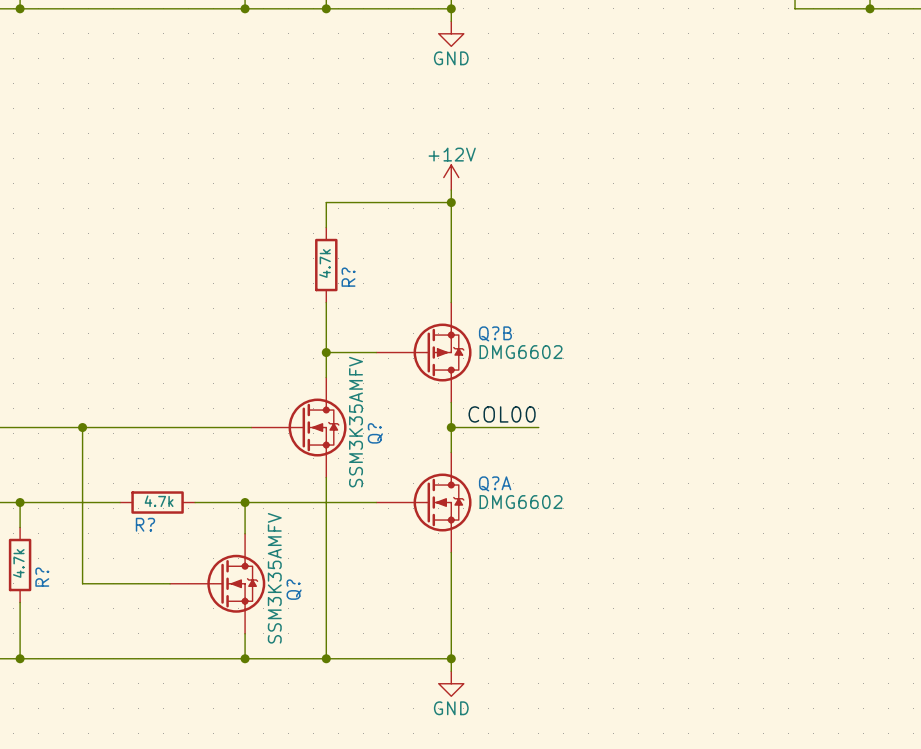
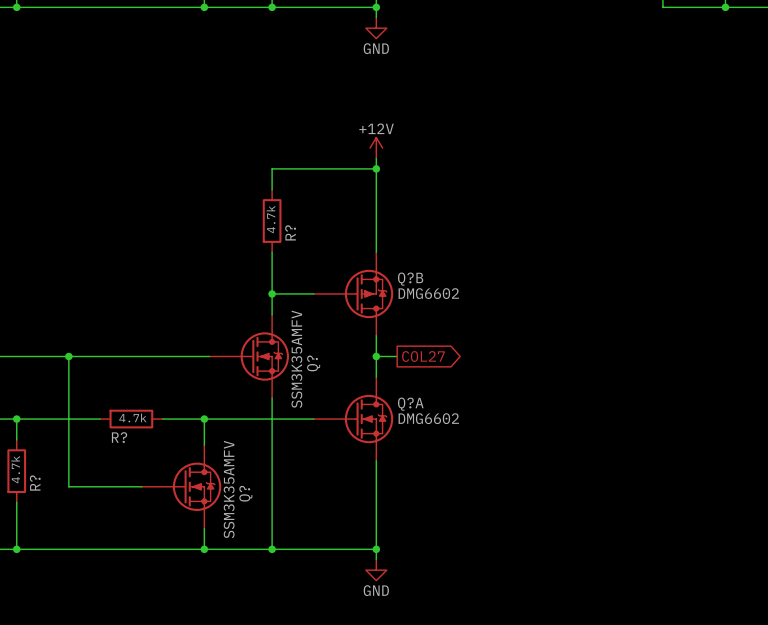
label: COL00 (502, 414) -> none
wire: (476, 427) (538, 427) -> none
global label: none -> COL27 (423, 356)

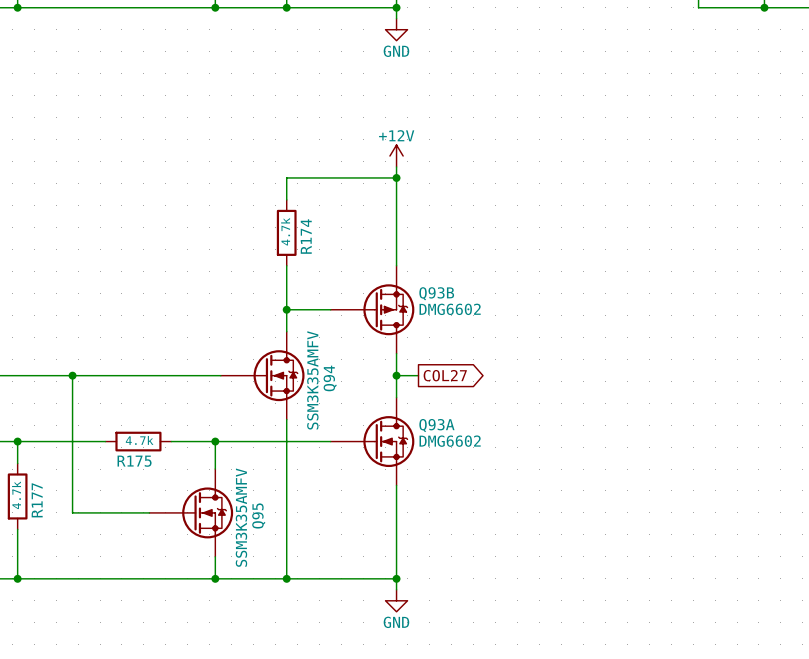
R? name: R? (290, 232) -> R174 (306, 236)
Q?B name: Q?B (410, 279) -> Q93B (436, 293)
Q? name: Q? (313, 363) -> Q94 (330, 378)
Q?A name: Q?A (410, 404) -> Q93A (436, 425)
R? name: R? (119, 437) -> R175 (134, 461)
R? name: R? (35, 483) -> R177 (37, 500)
Q? name: Q? (245, 493) -> Q95 (258, 515)

